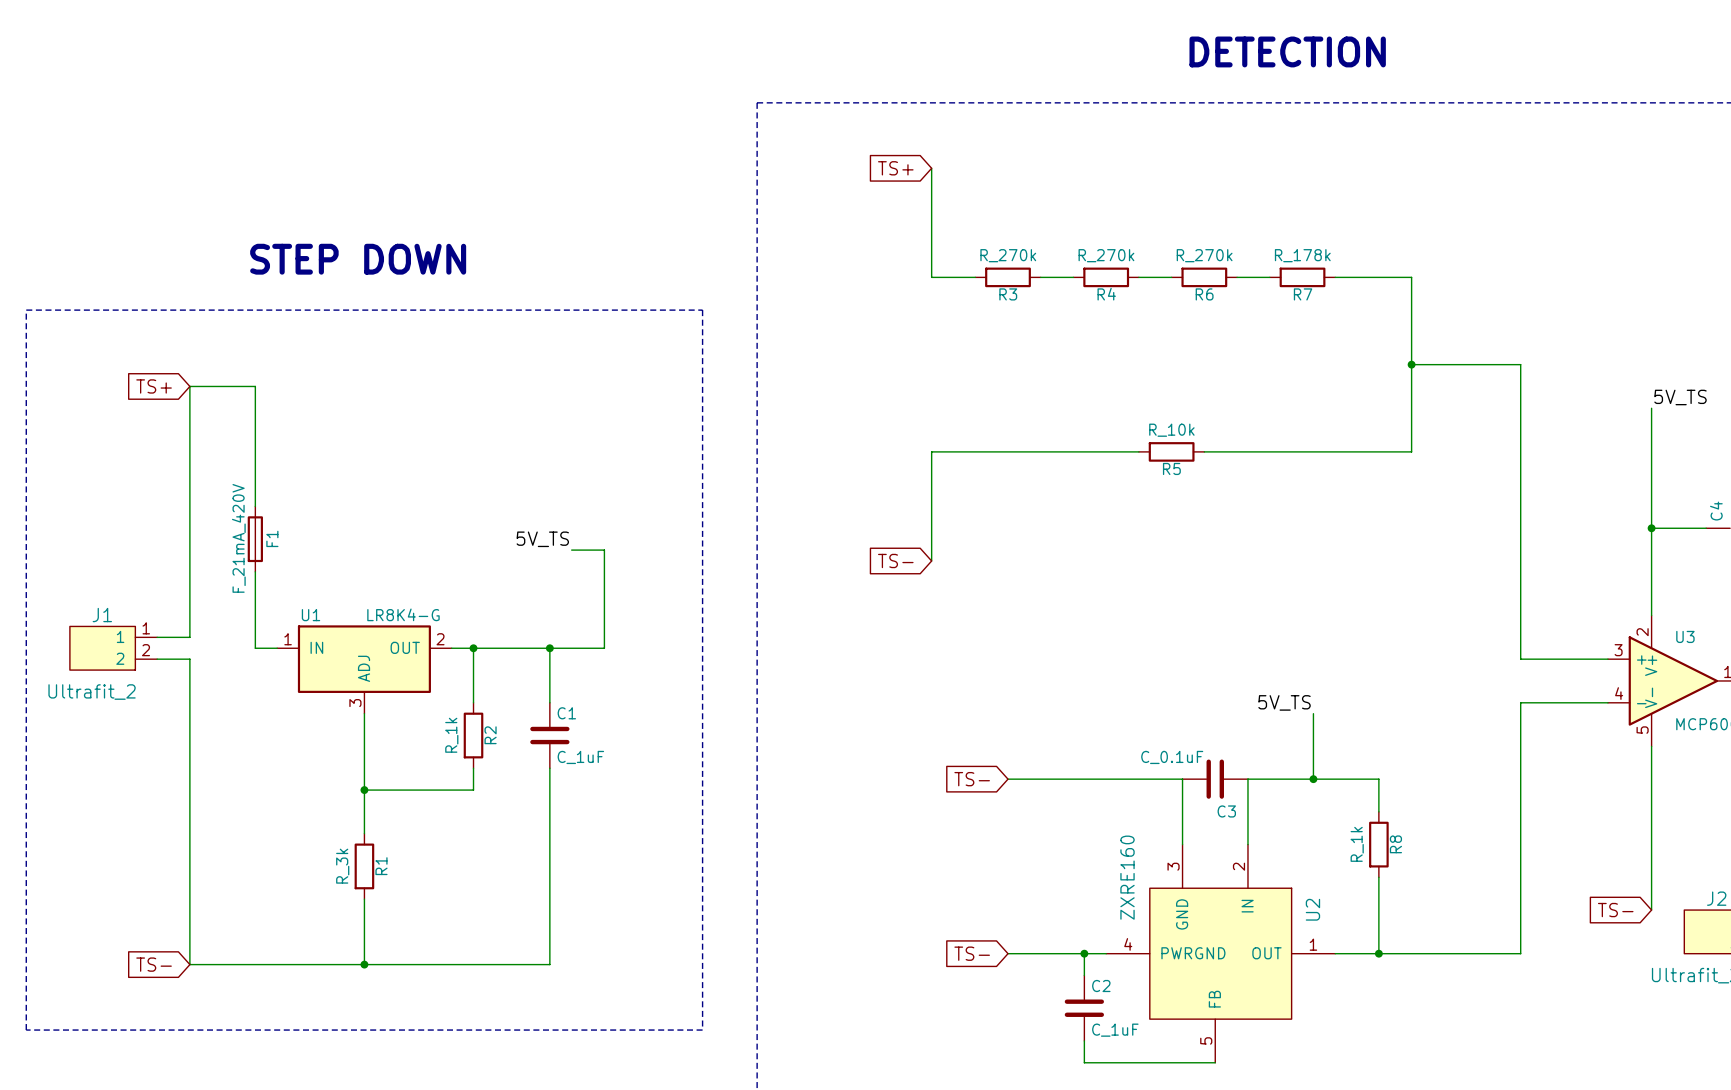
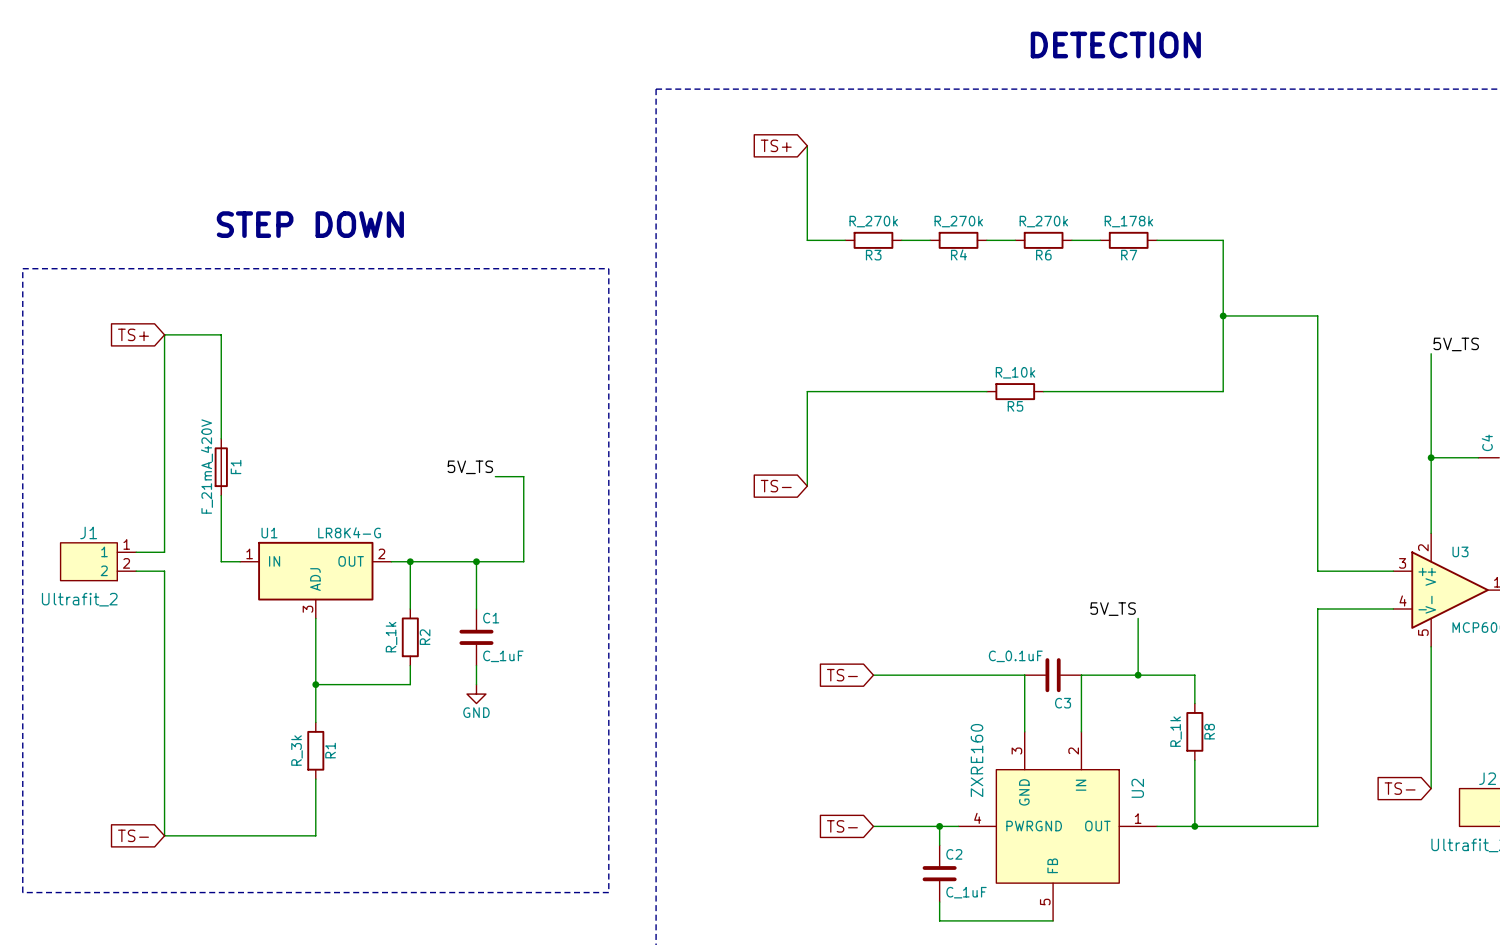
wire: (549, 790) (549, 964) (364, 964) -> none
power symbol: none -> GND (476, 694)
junction: (364, 964) -> none

